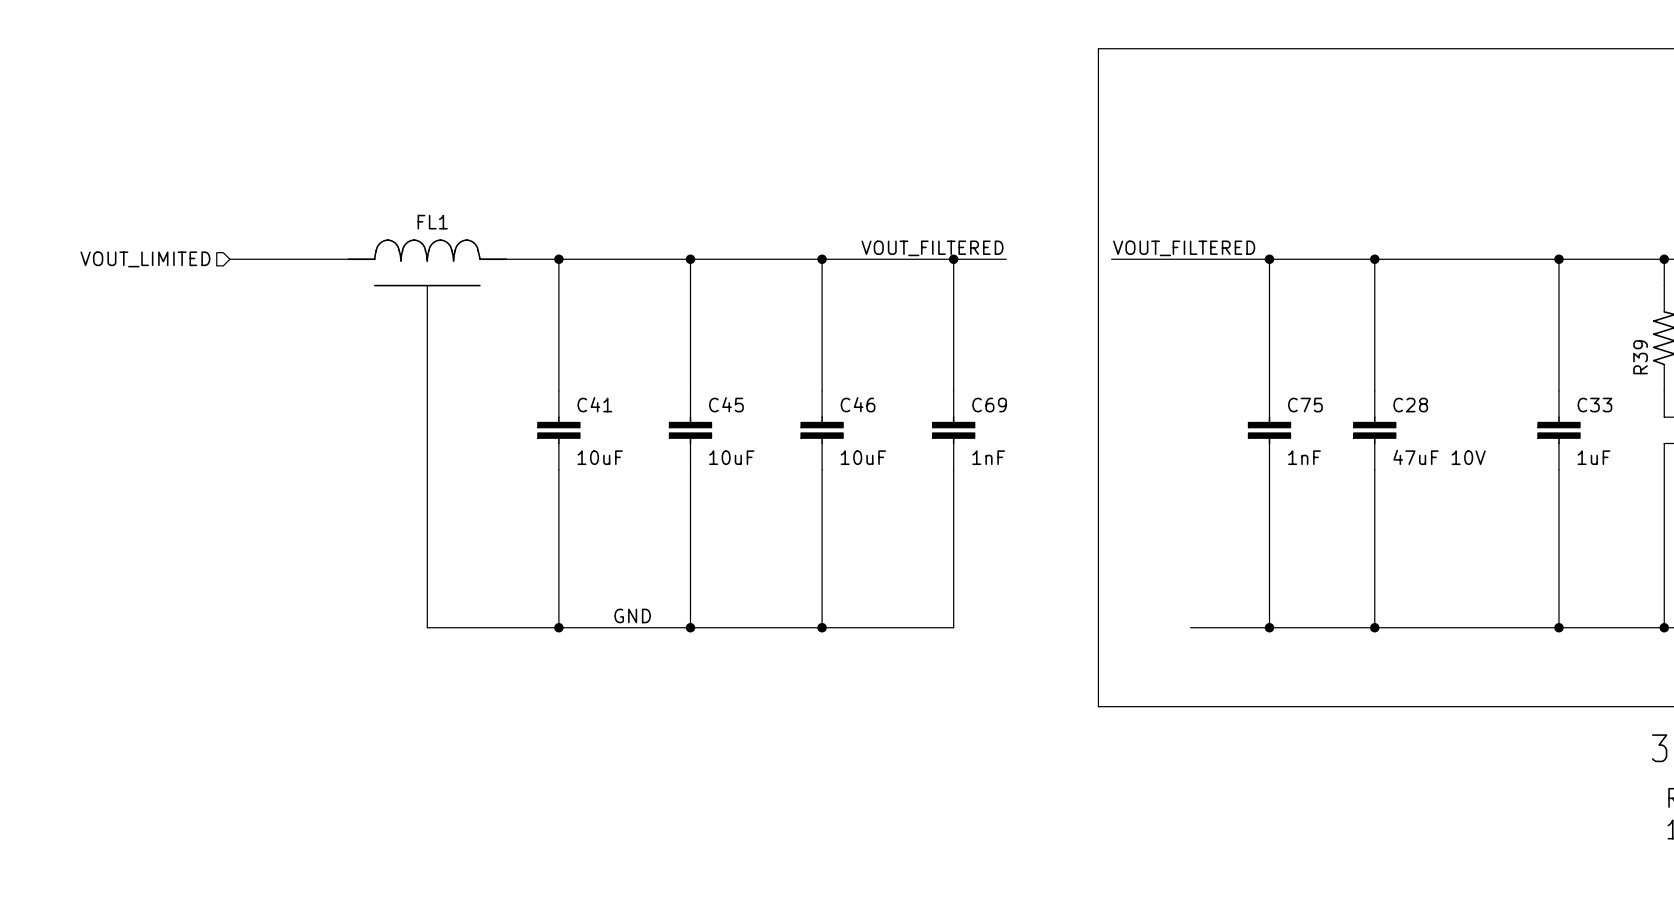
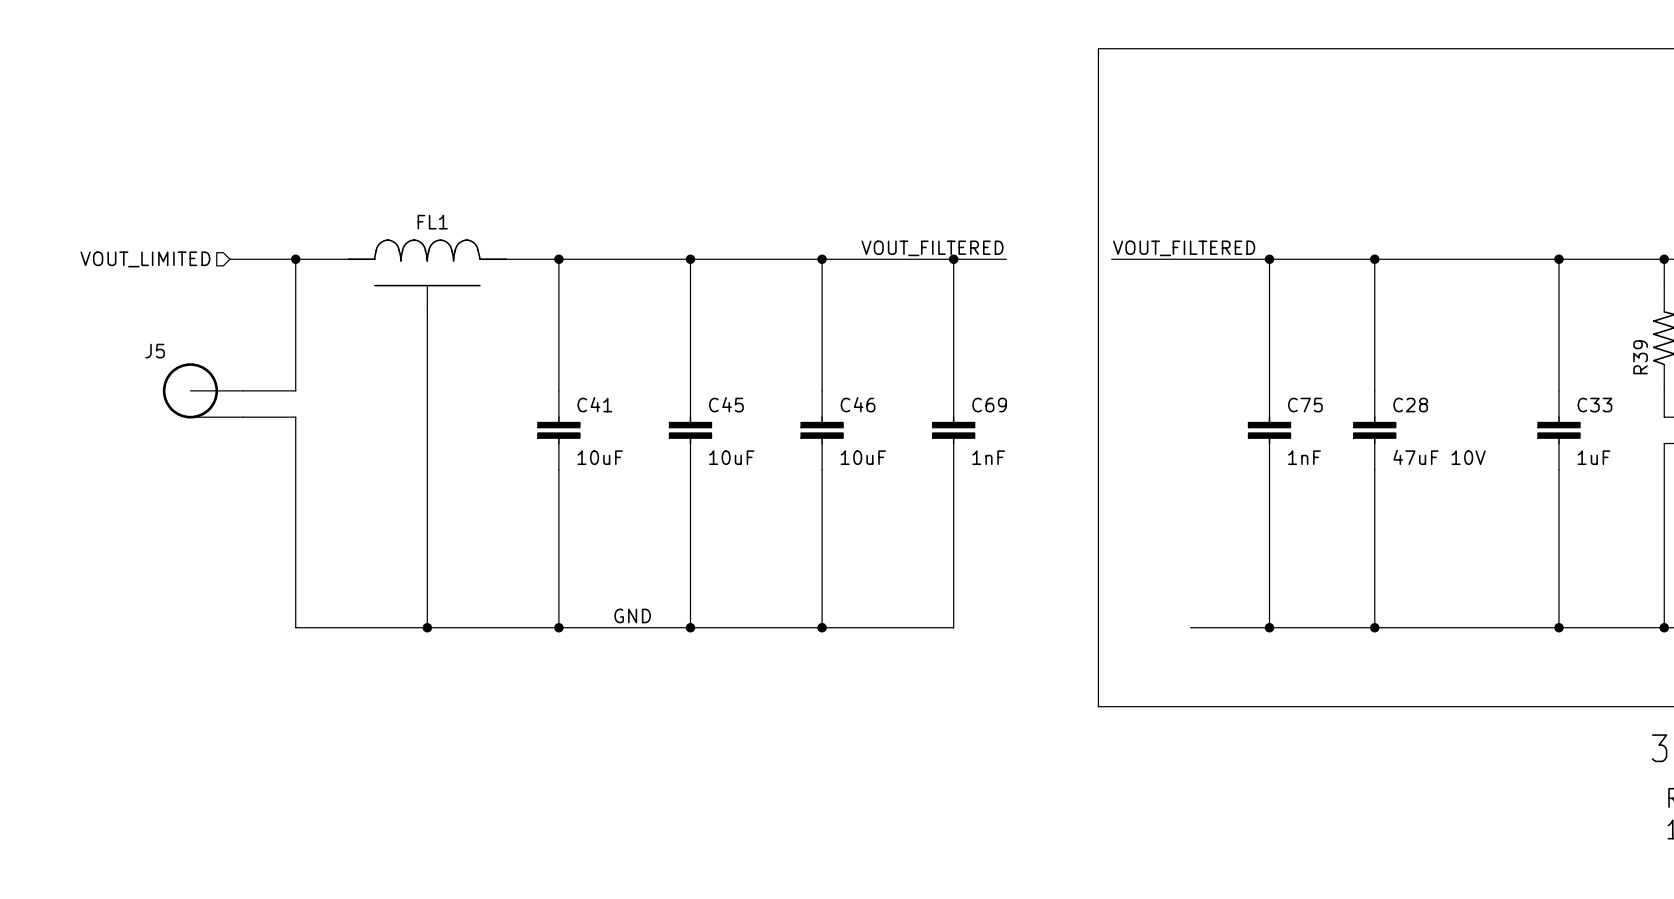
wire: none -> (295, 259) (295, 390) (243, 390)
junction: none -> (295, 259)
J5: none -> (202, 390)
wire: none -> (243, 417) (295, 417) (295, 627) (427, 627)
junction: none -> (427, 627)

